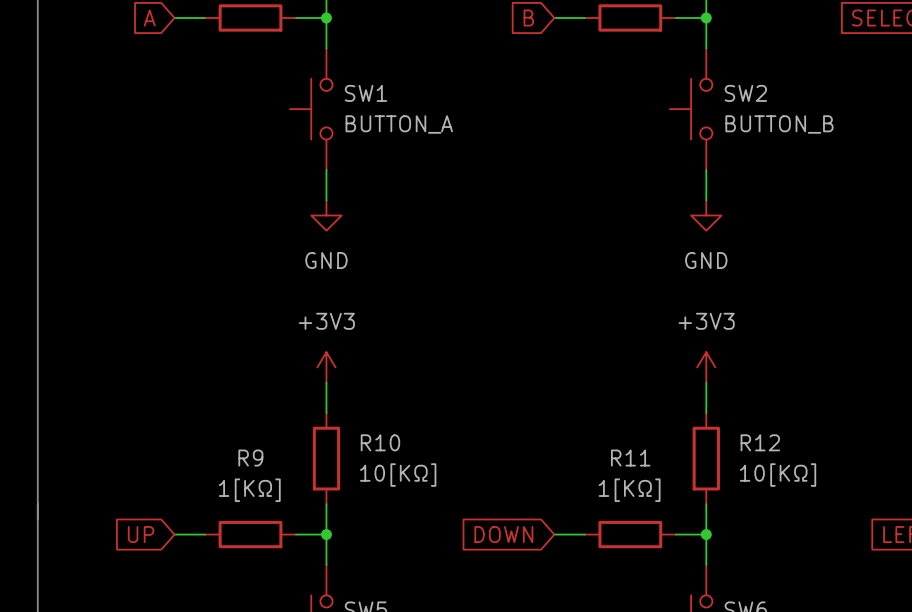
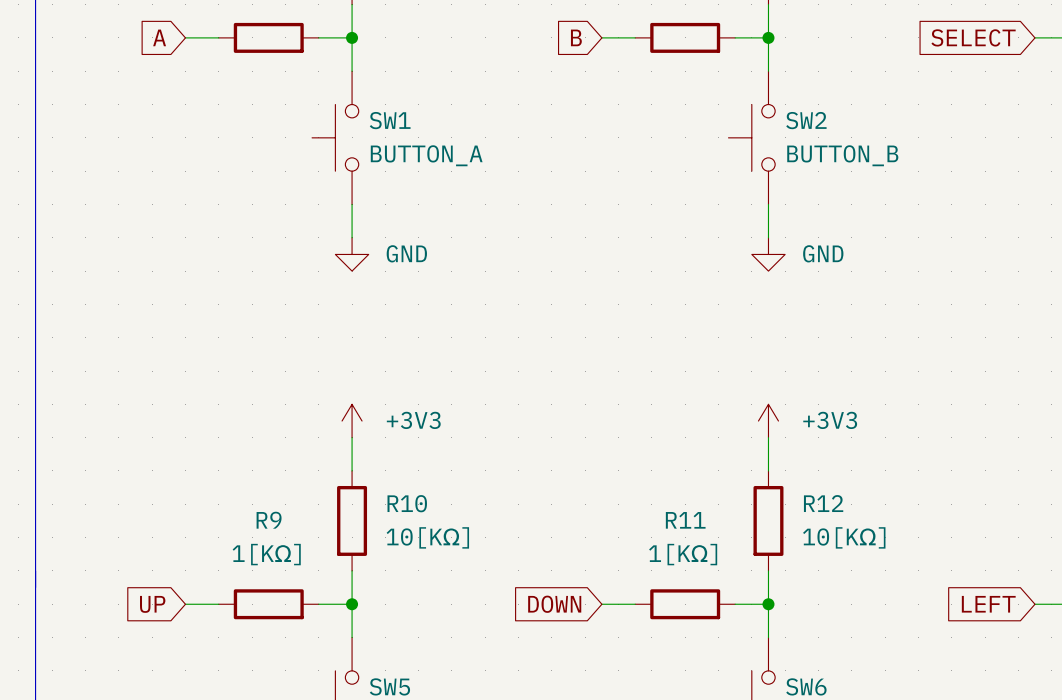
power symbol text position: GND (326, 260) -> GND (406, 253)
power symbol text position: GND (706, 260) -> GND (823, 253)
power symbol text position: +3V3 (326, 321) -> +3V3 (413, 420)
power symbol text position: +3V3 (706, 321) -> +3V3 (830, 420)

